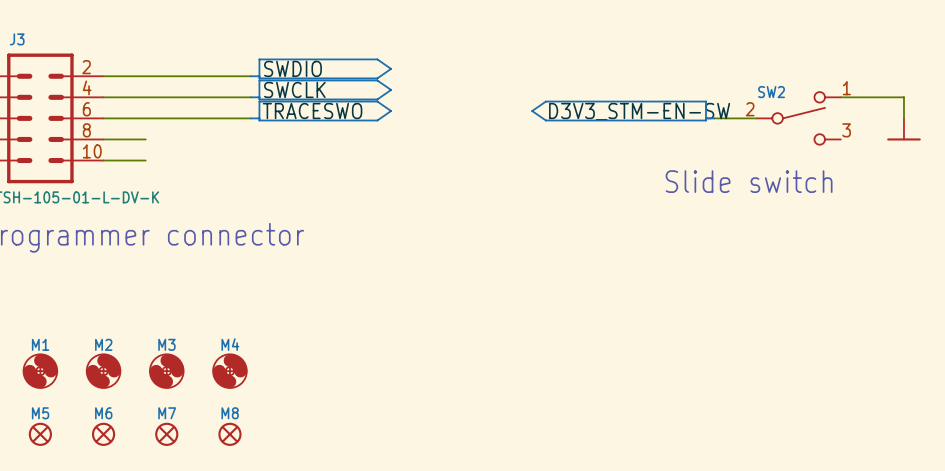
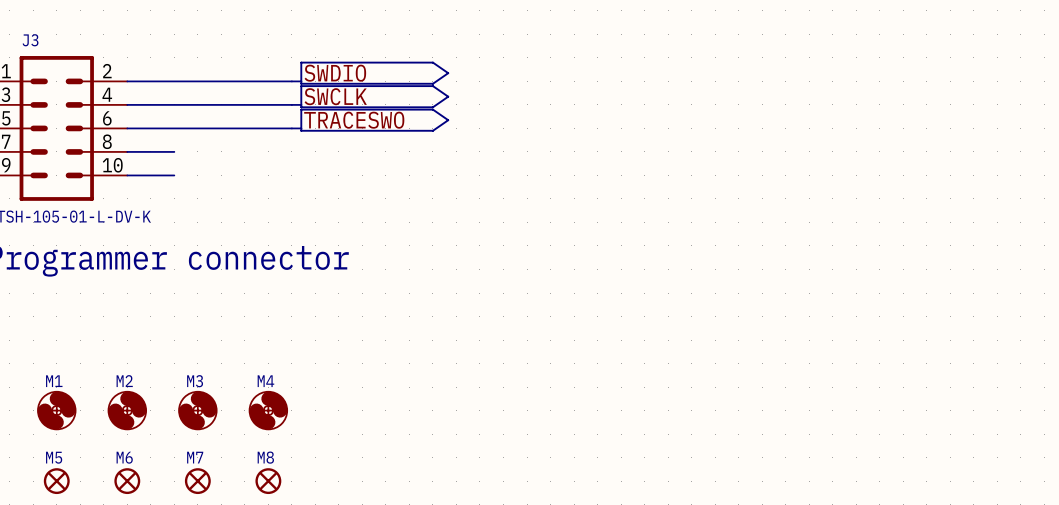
wire: (840, 97) (903, 97) (903, 118) -> none
part: (623, 111) -> none
label: D3V3_STM-EN-SW (639, 111) -> none
wire: (714, 118) (756, 118) -> none
SW2: (798, 118) -> none
power symbol: (903, 129) -> none
text: Slide switch (749, 181) -> none

